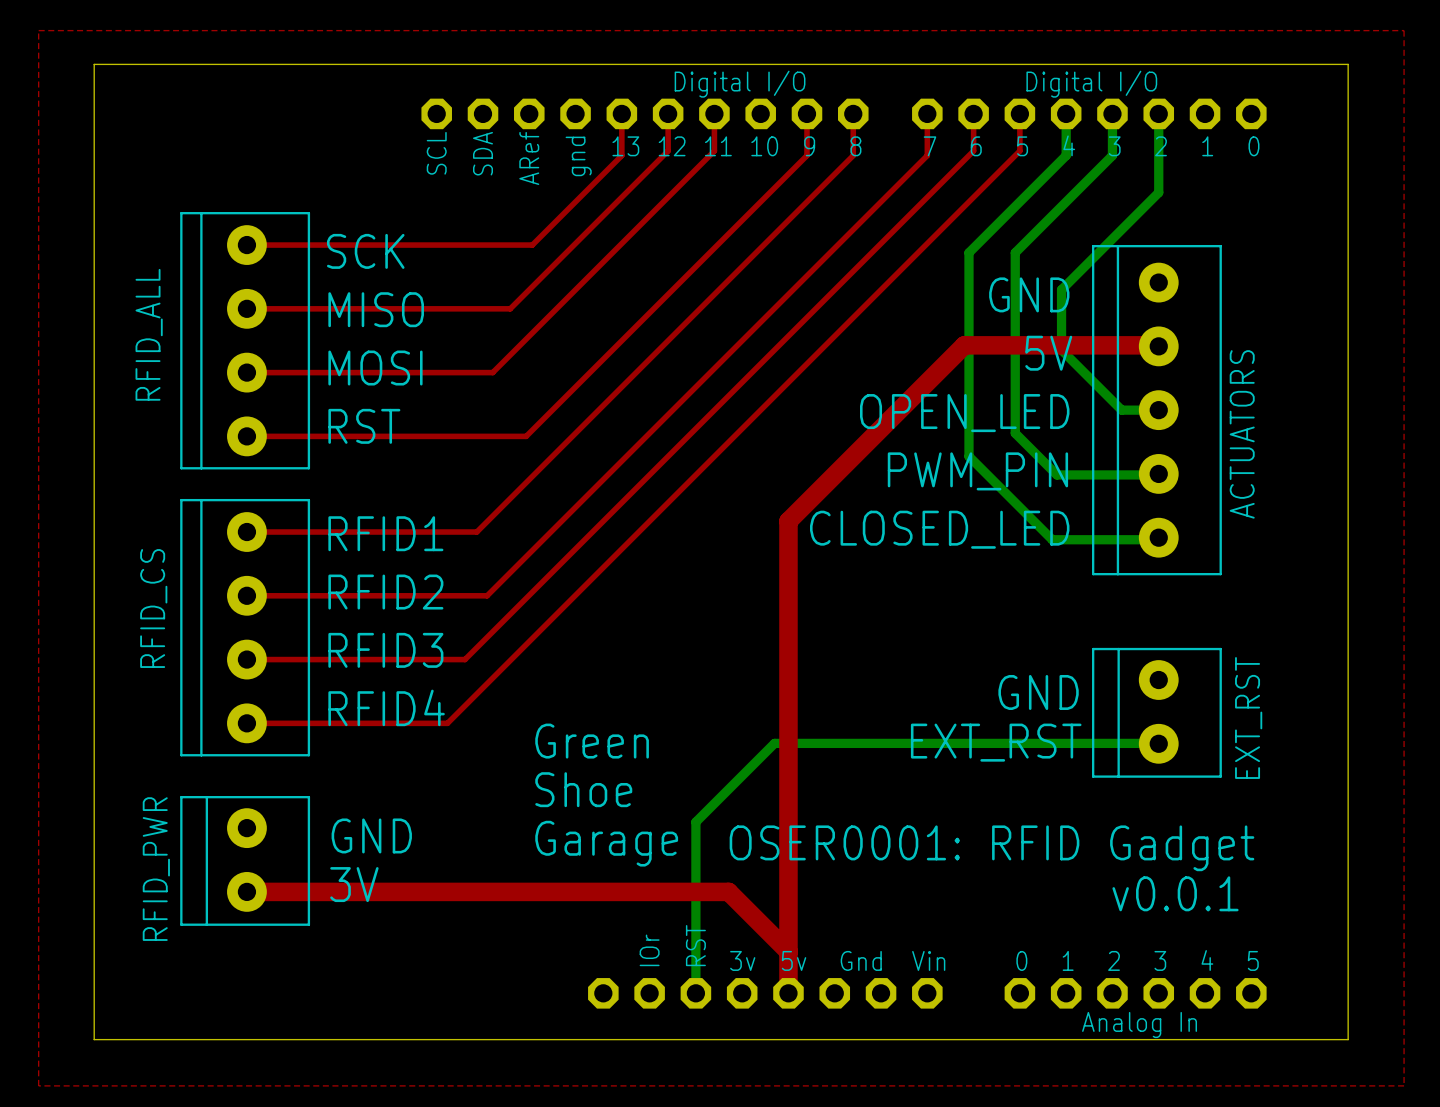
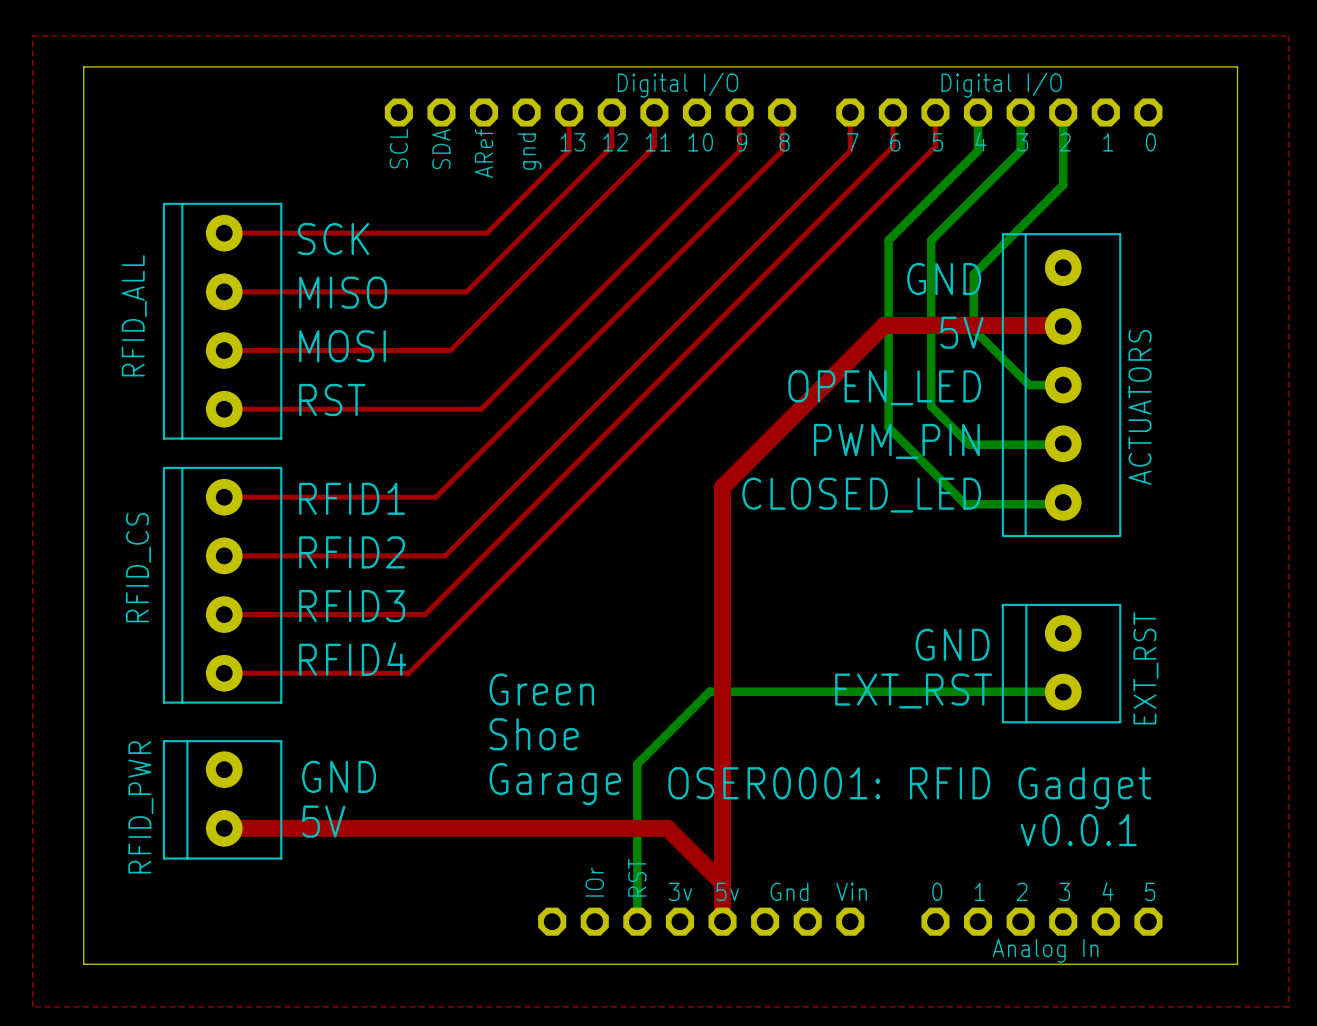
text: 3V (354, 884) -> 5V (323, 821)

